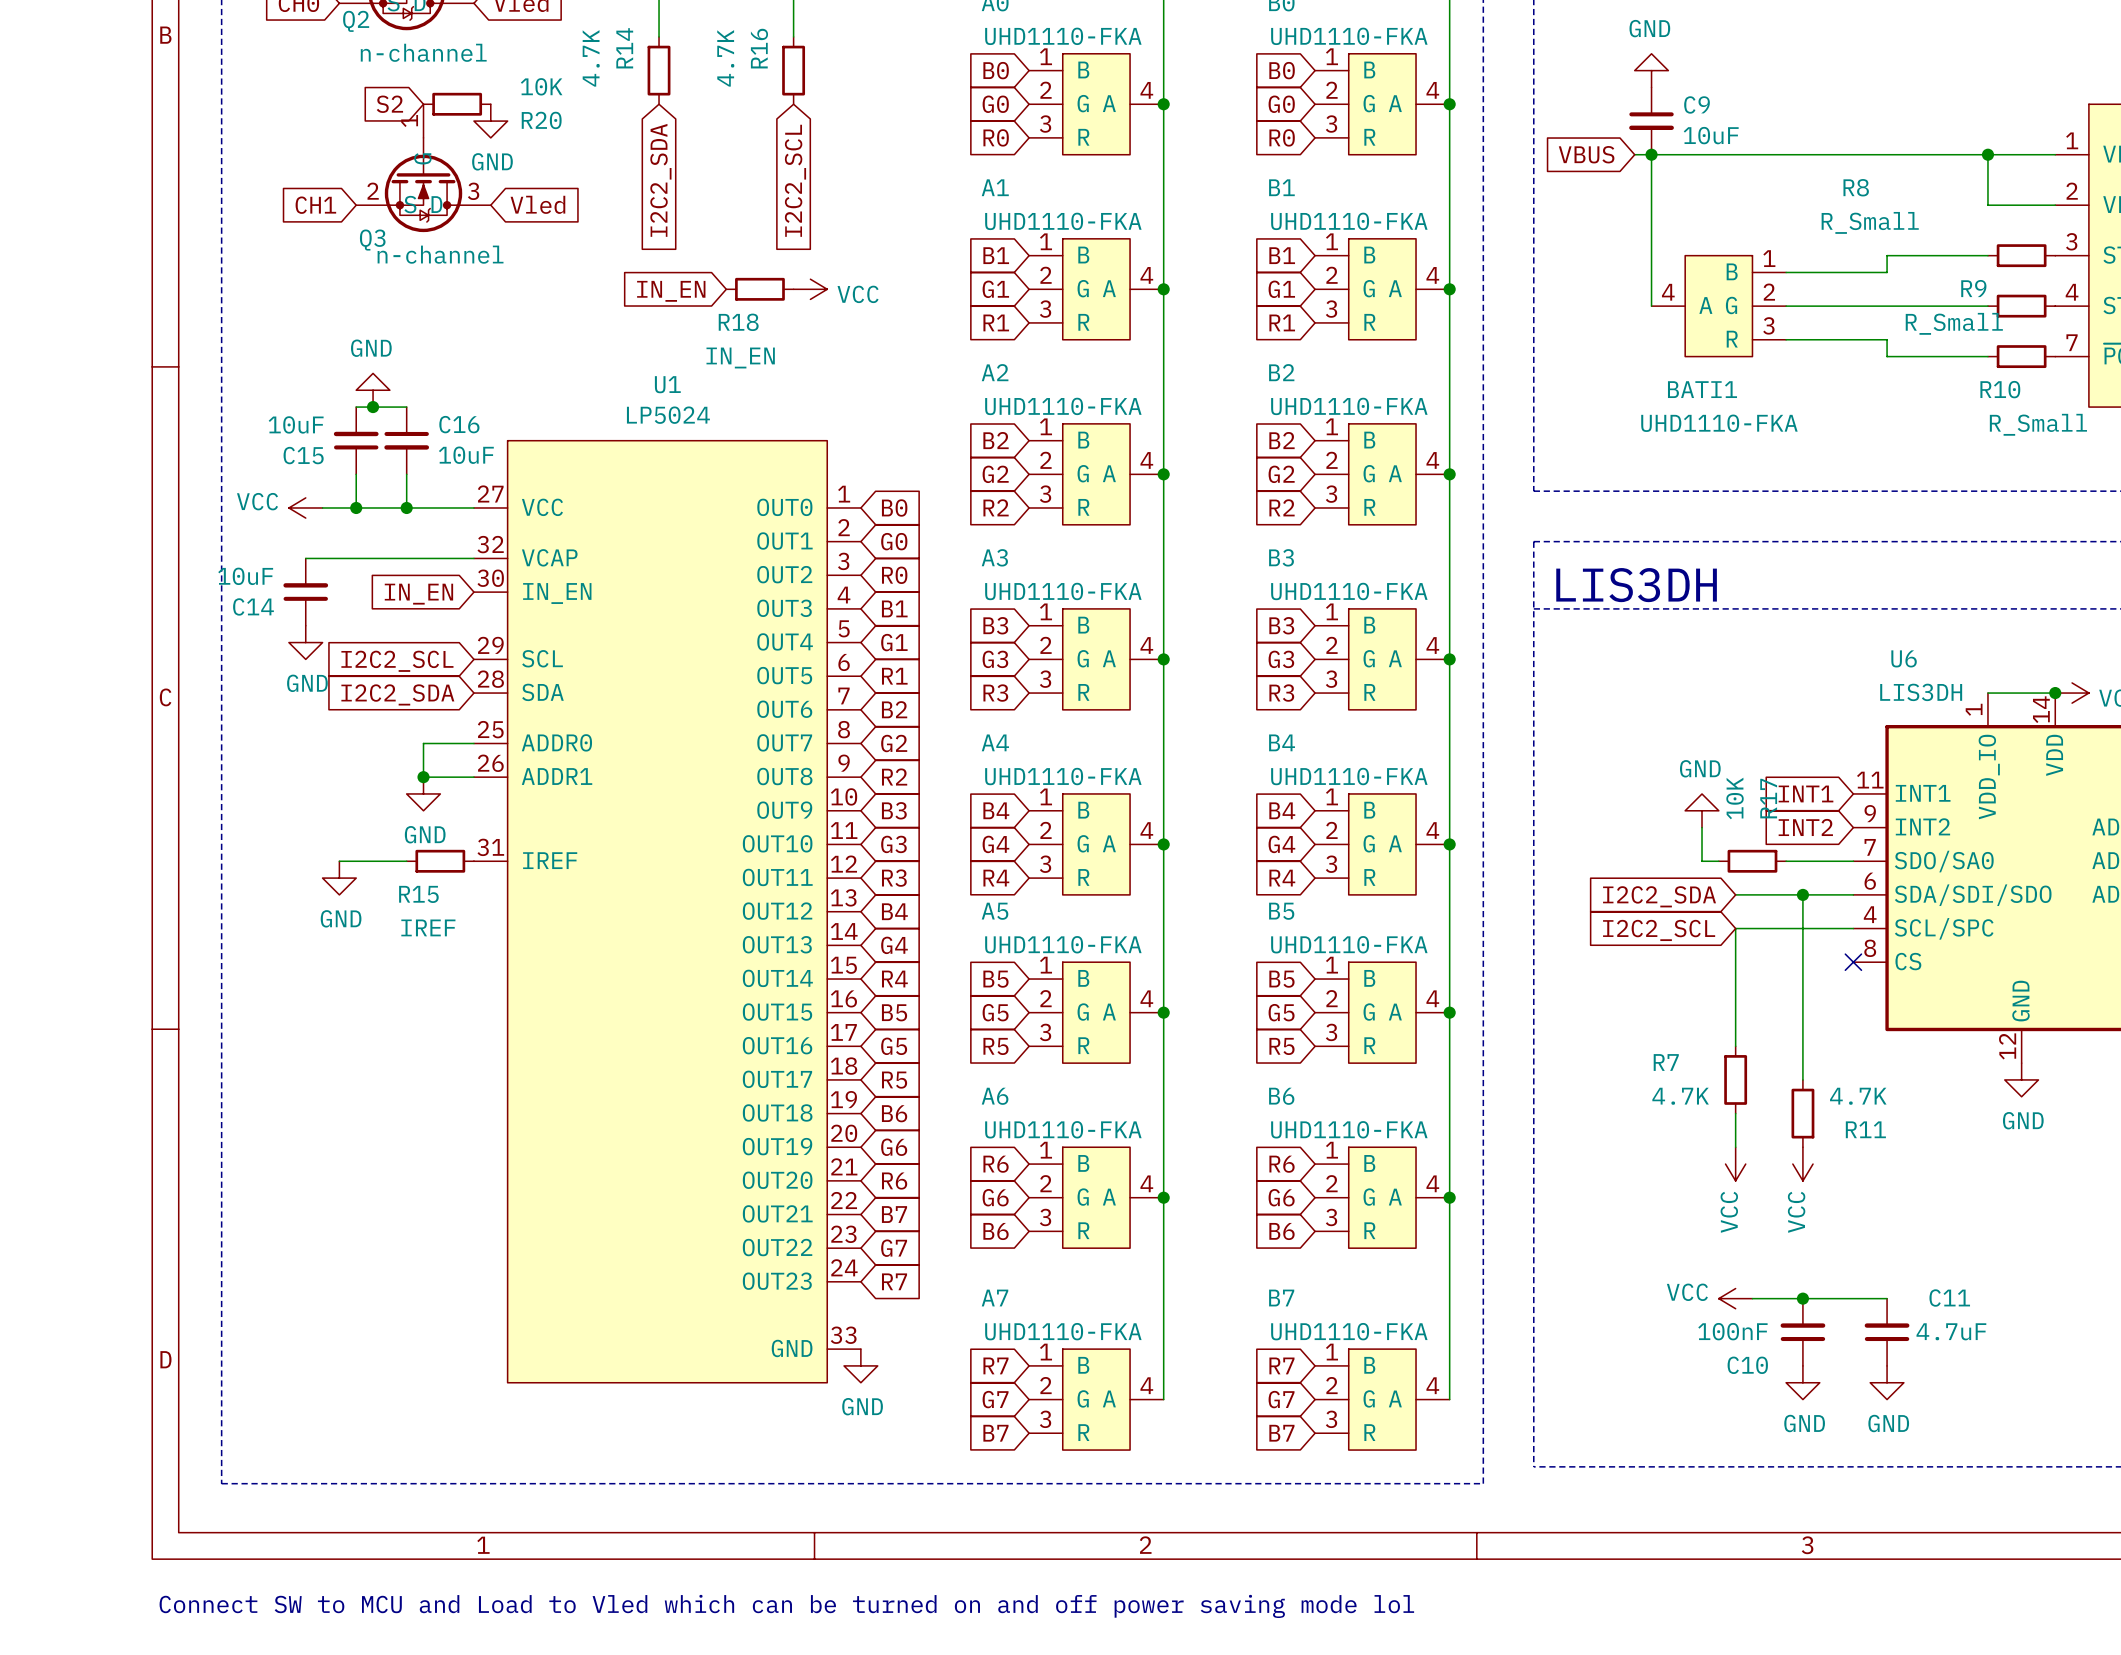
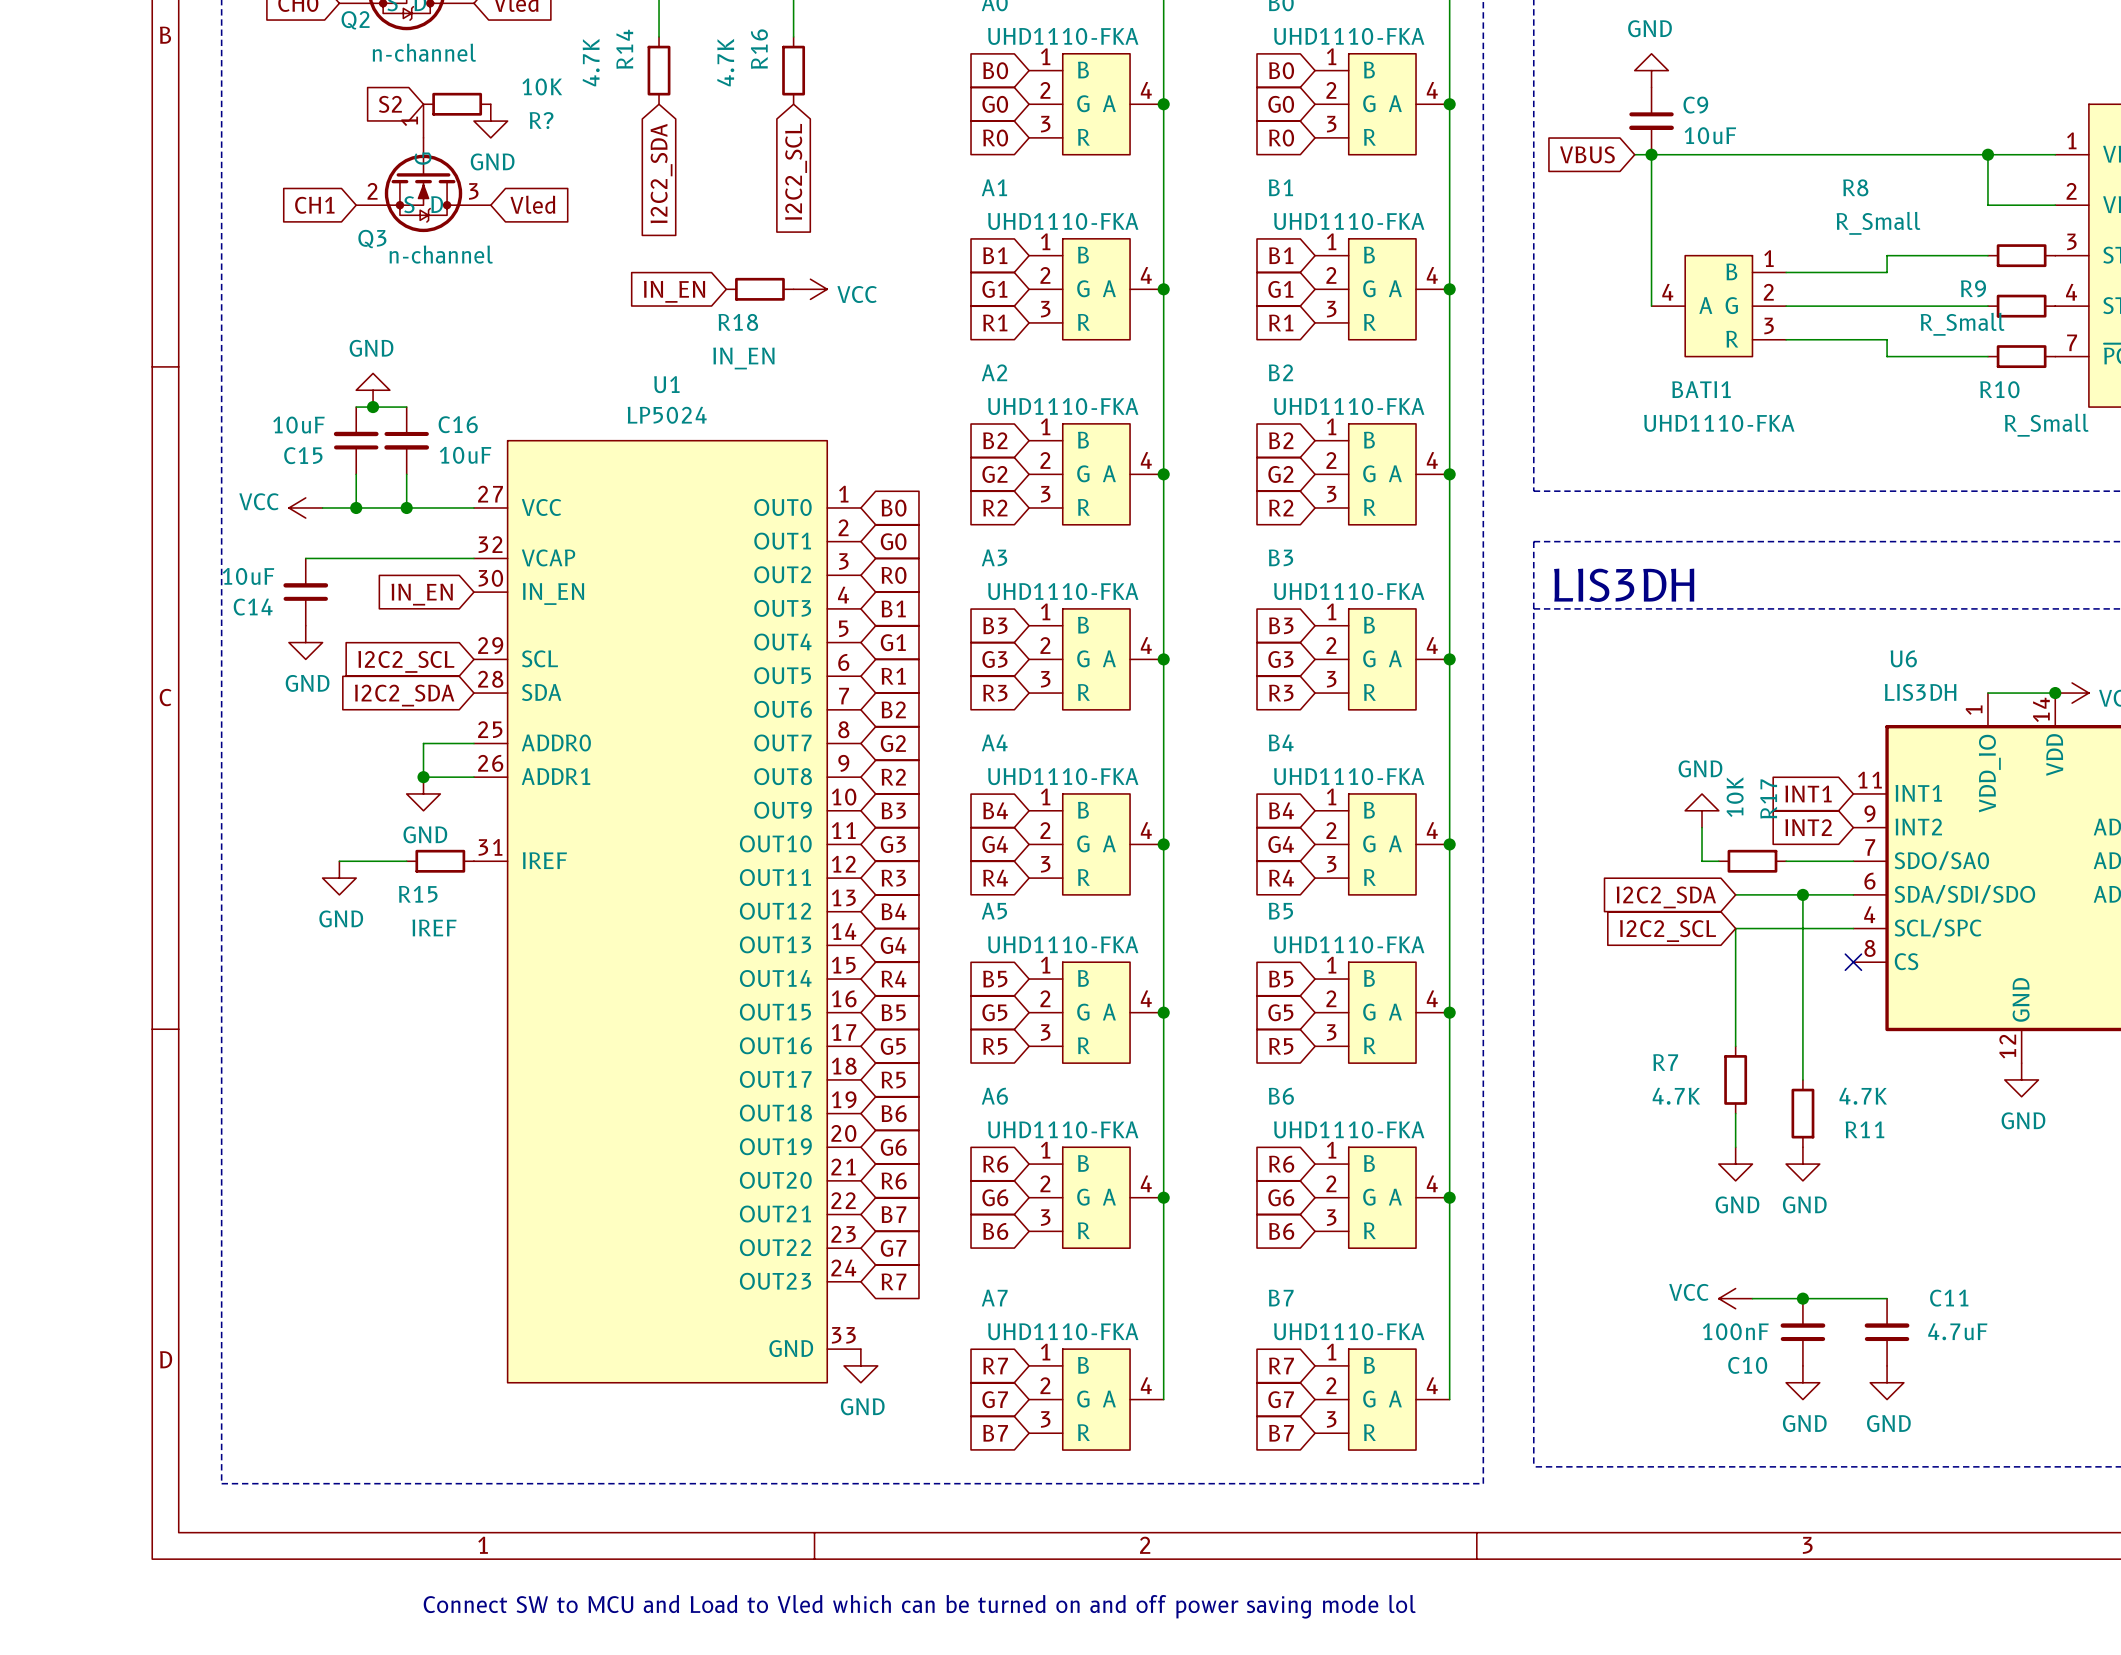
R20 name: R20 (541, 120) -> R? (541, 120)
power symbol: VCC (1735, 1164) -> GND (1735, 1164)
power symbol: VCC (1802, 1164) -> GND (1802, 1164)

